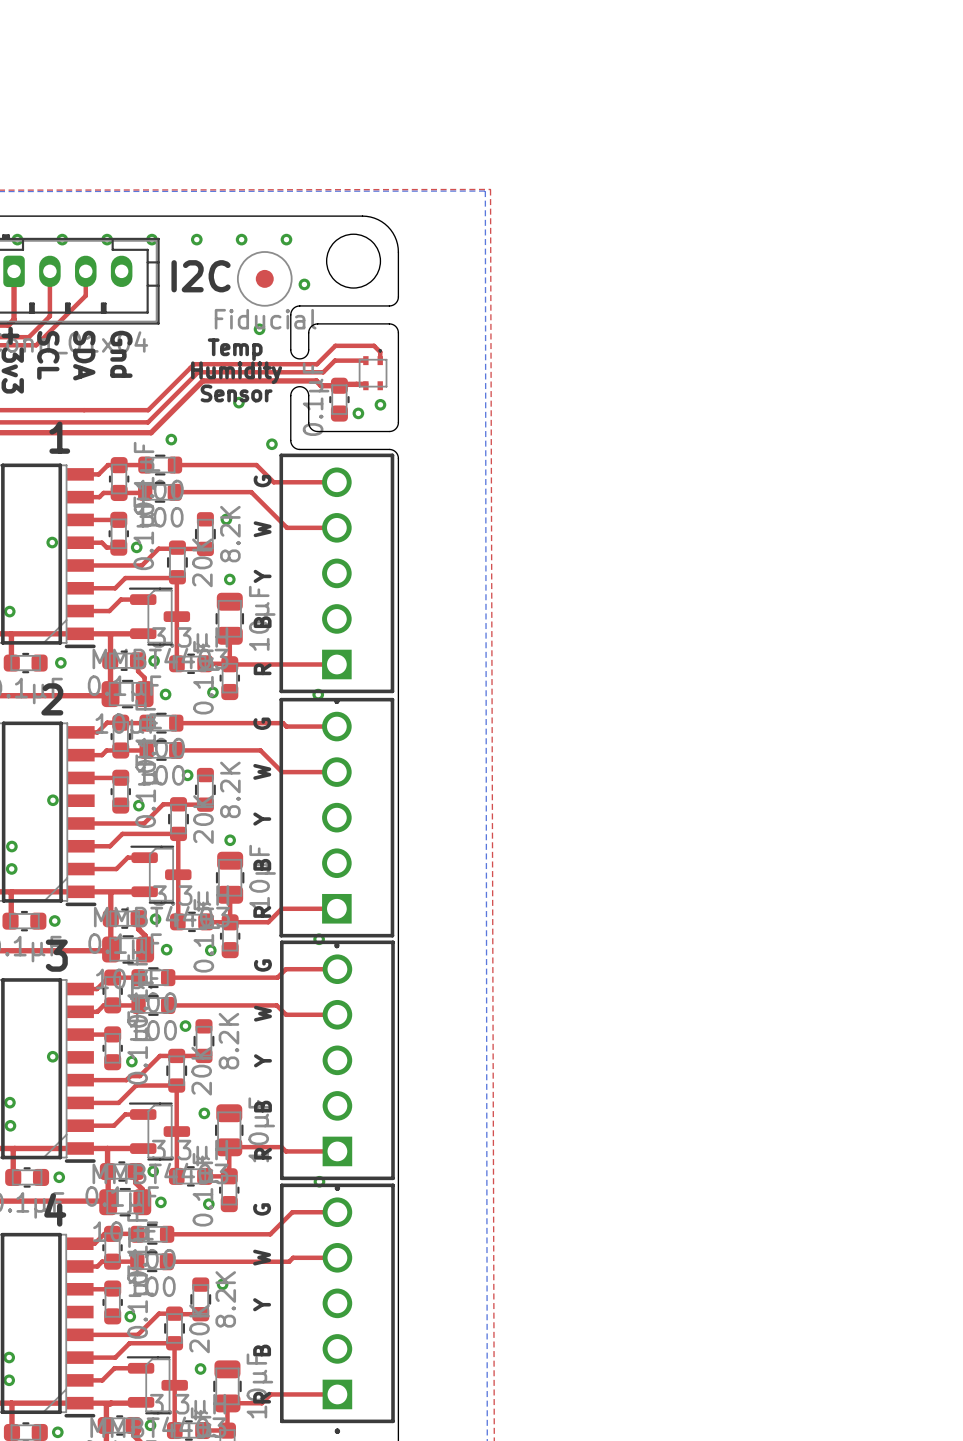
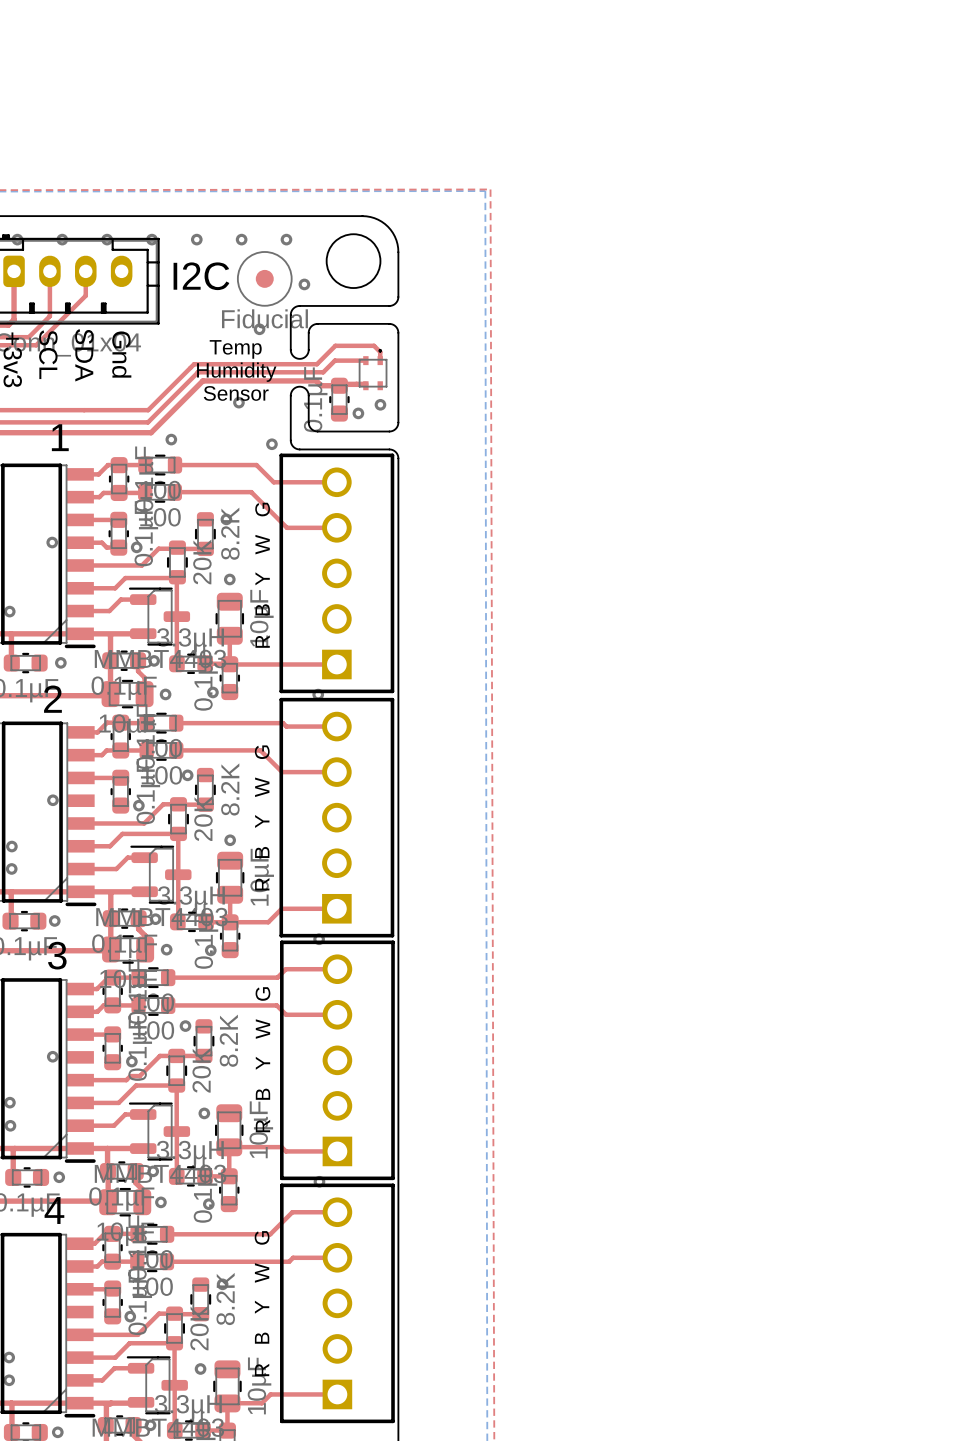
part footprint: [279, 453, 395, 704] -> [279, 453, 395, 694]
part footprint: [279, 697, 395, 949] -> [279, 697, 395, 938]
part footprint: [280, 940, 395, 1191] -> [280, 940, 395, 1181]
part footprint: [280, 1183, 395, 1434] -> [280, 1183, 395, 1424]

